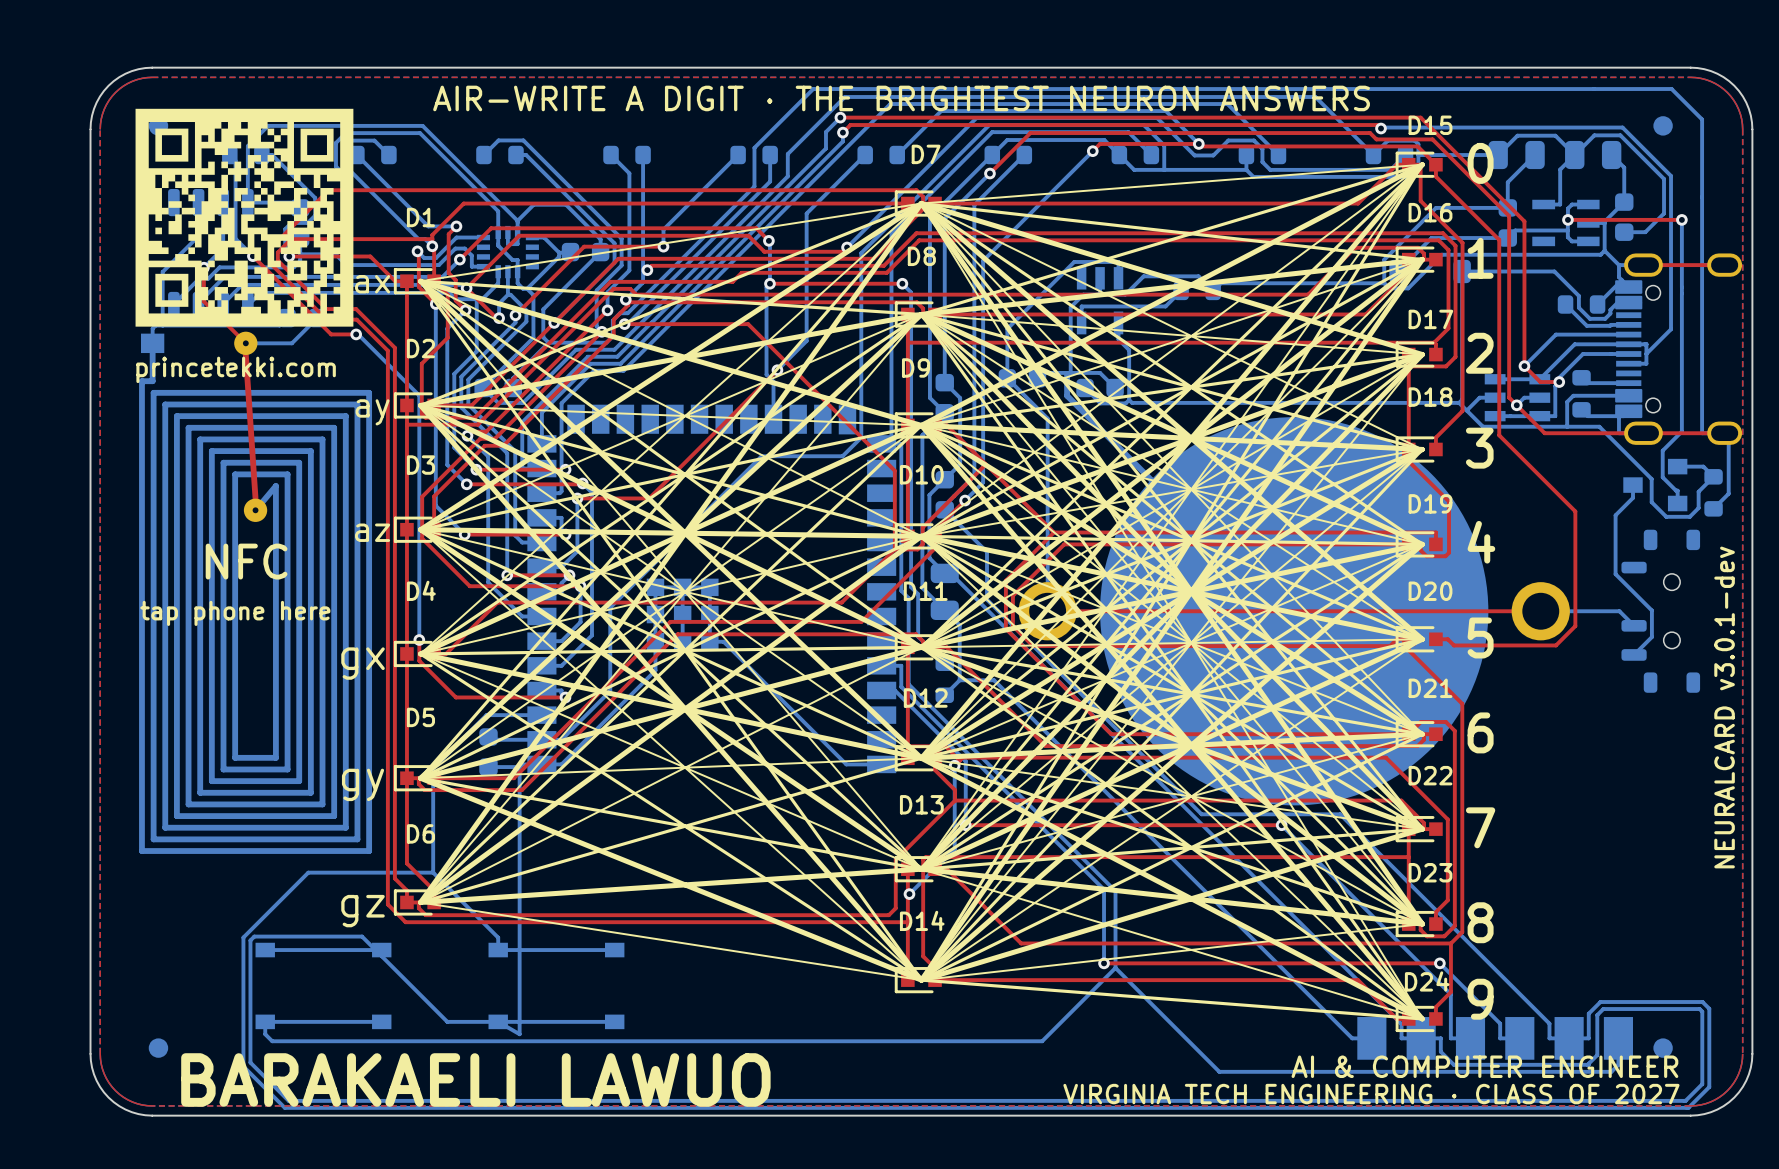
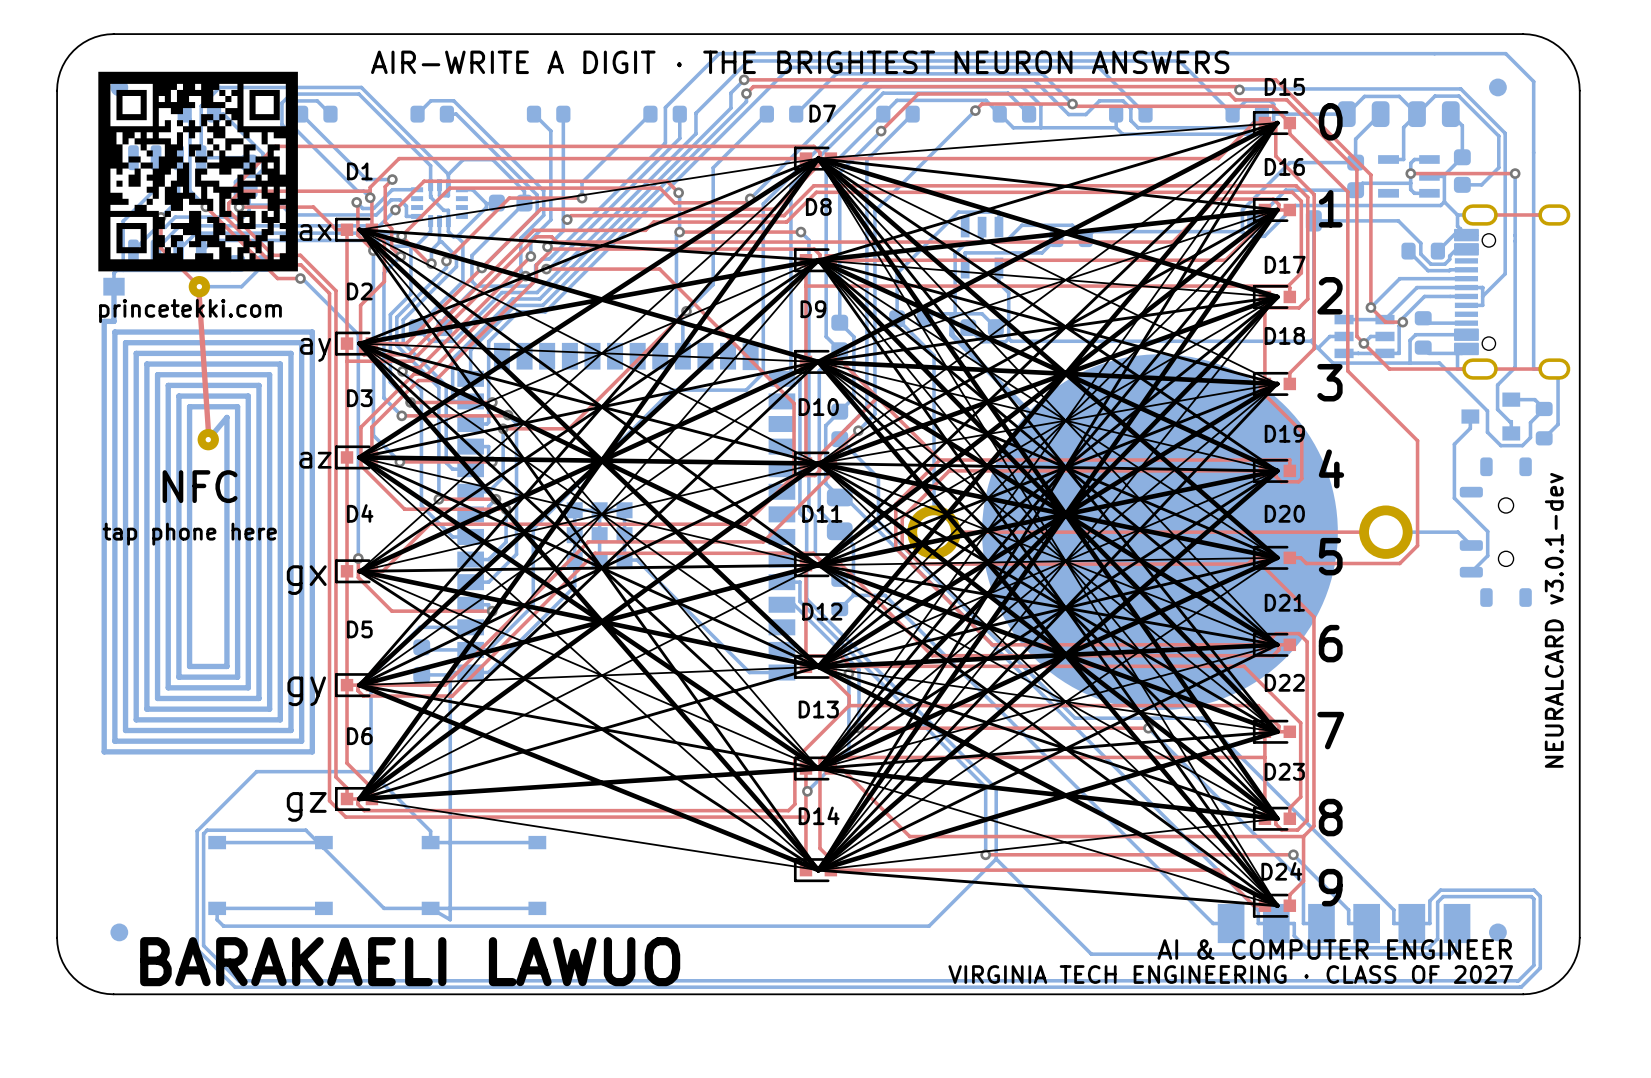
top zone outline: (152, 77) (1690, 77) (1705, 79) (1719, 86) (1736, 104) (1742, 129) (1742, 1053) (1740, 1069) (1733, 1082) (1715, 1099) (1690, 1105) (152, 1105) (137, 1103) (123, 1097) (106, 1078) (100, 1053) (100, 129) (104, 109) (115, 92) (132, 81) (152, 77) -> none

